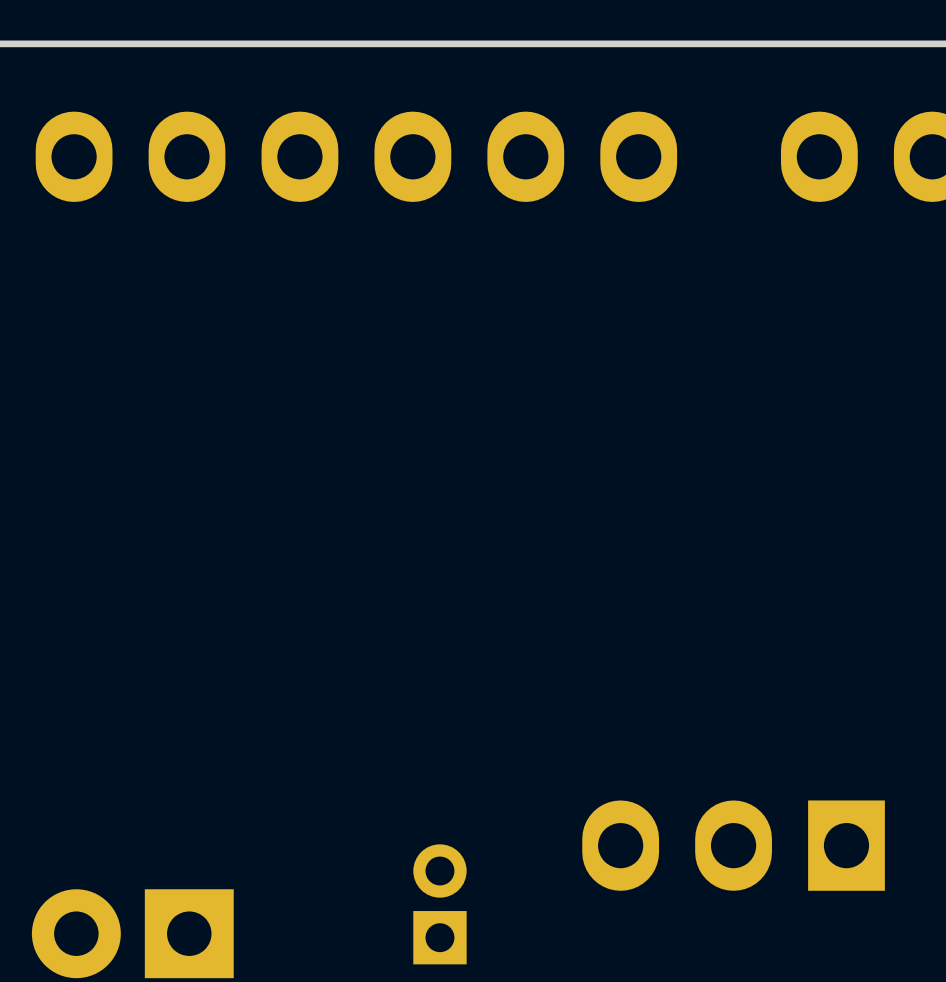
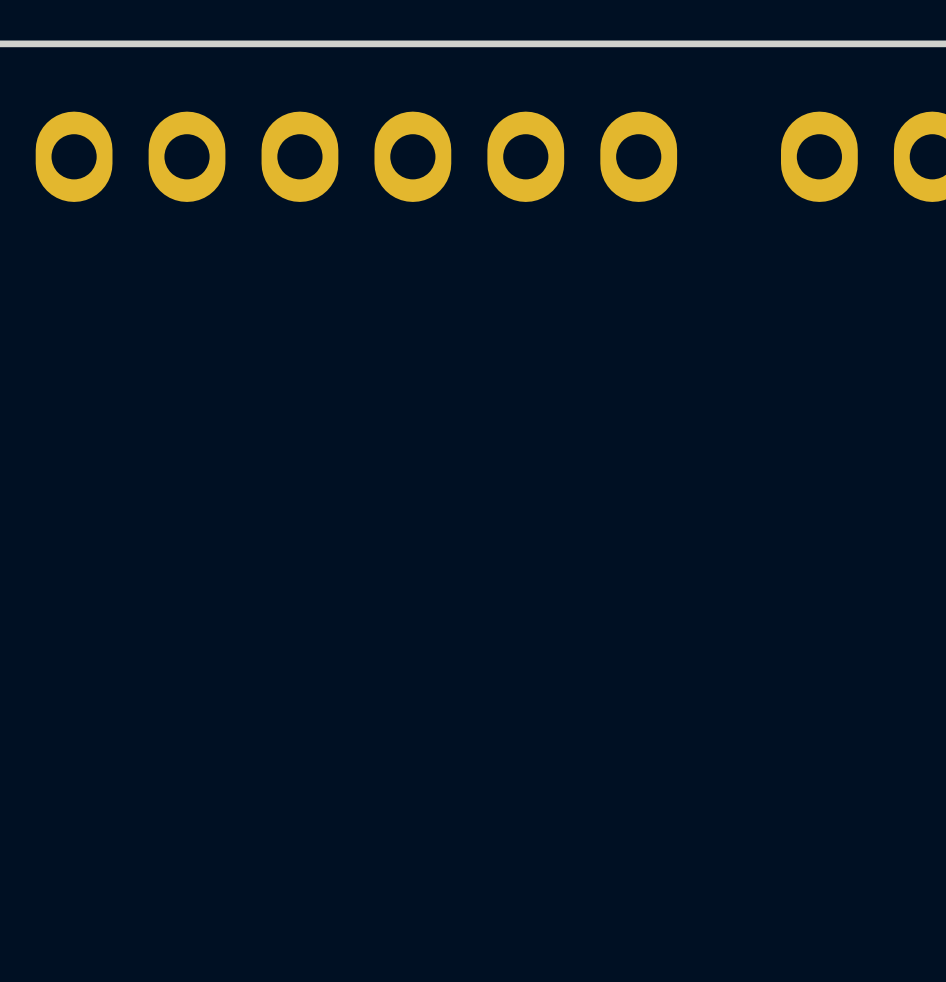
part: (733, 845) -> none
part: (439, 904) -> none
part: (132, 933) -> none

